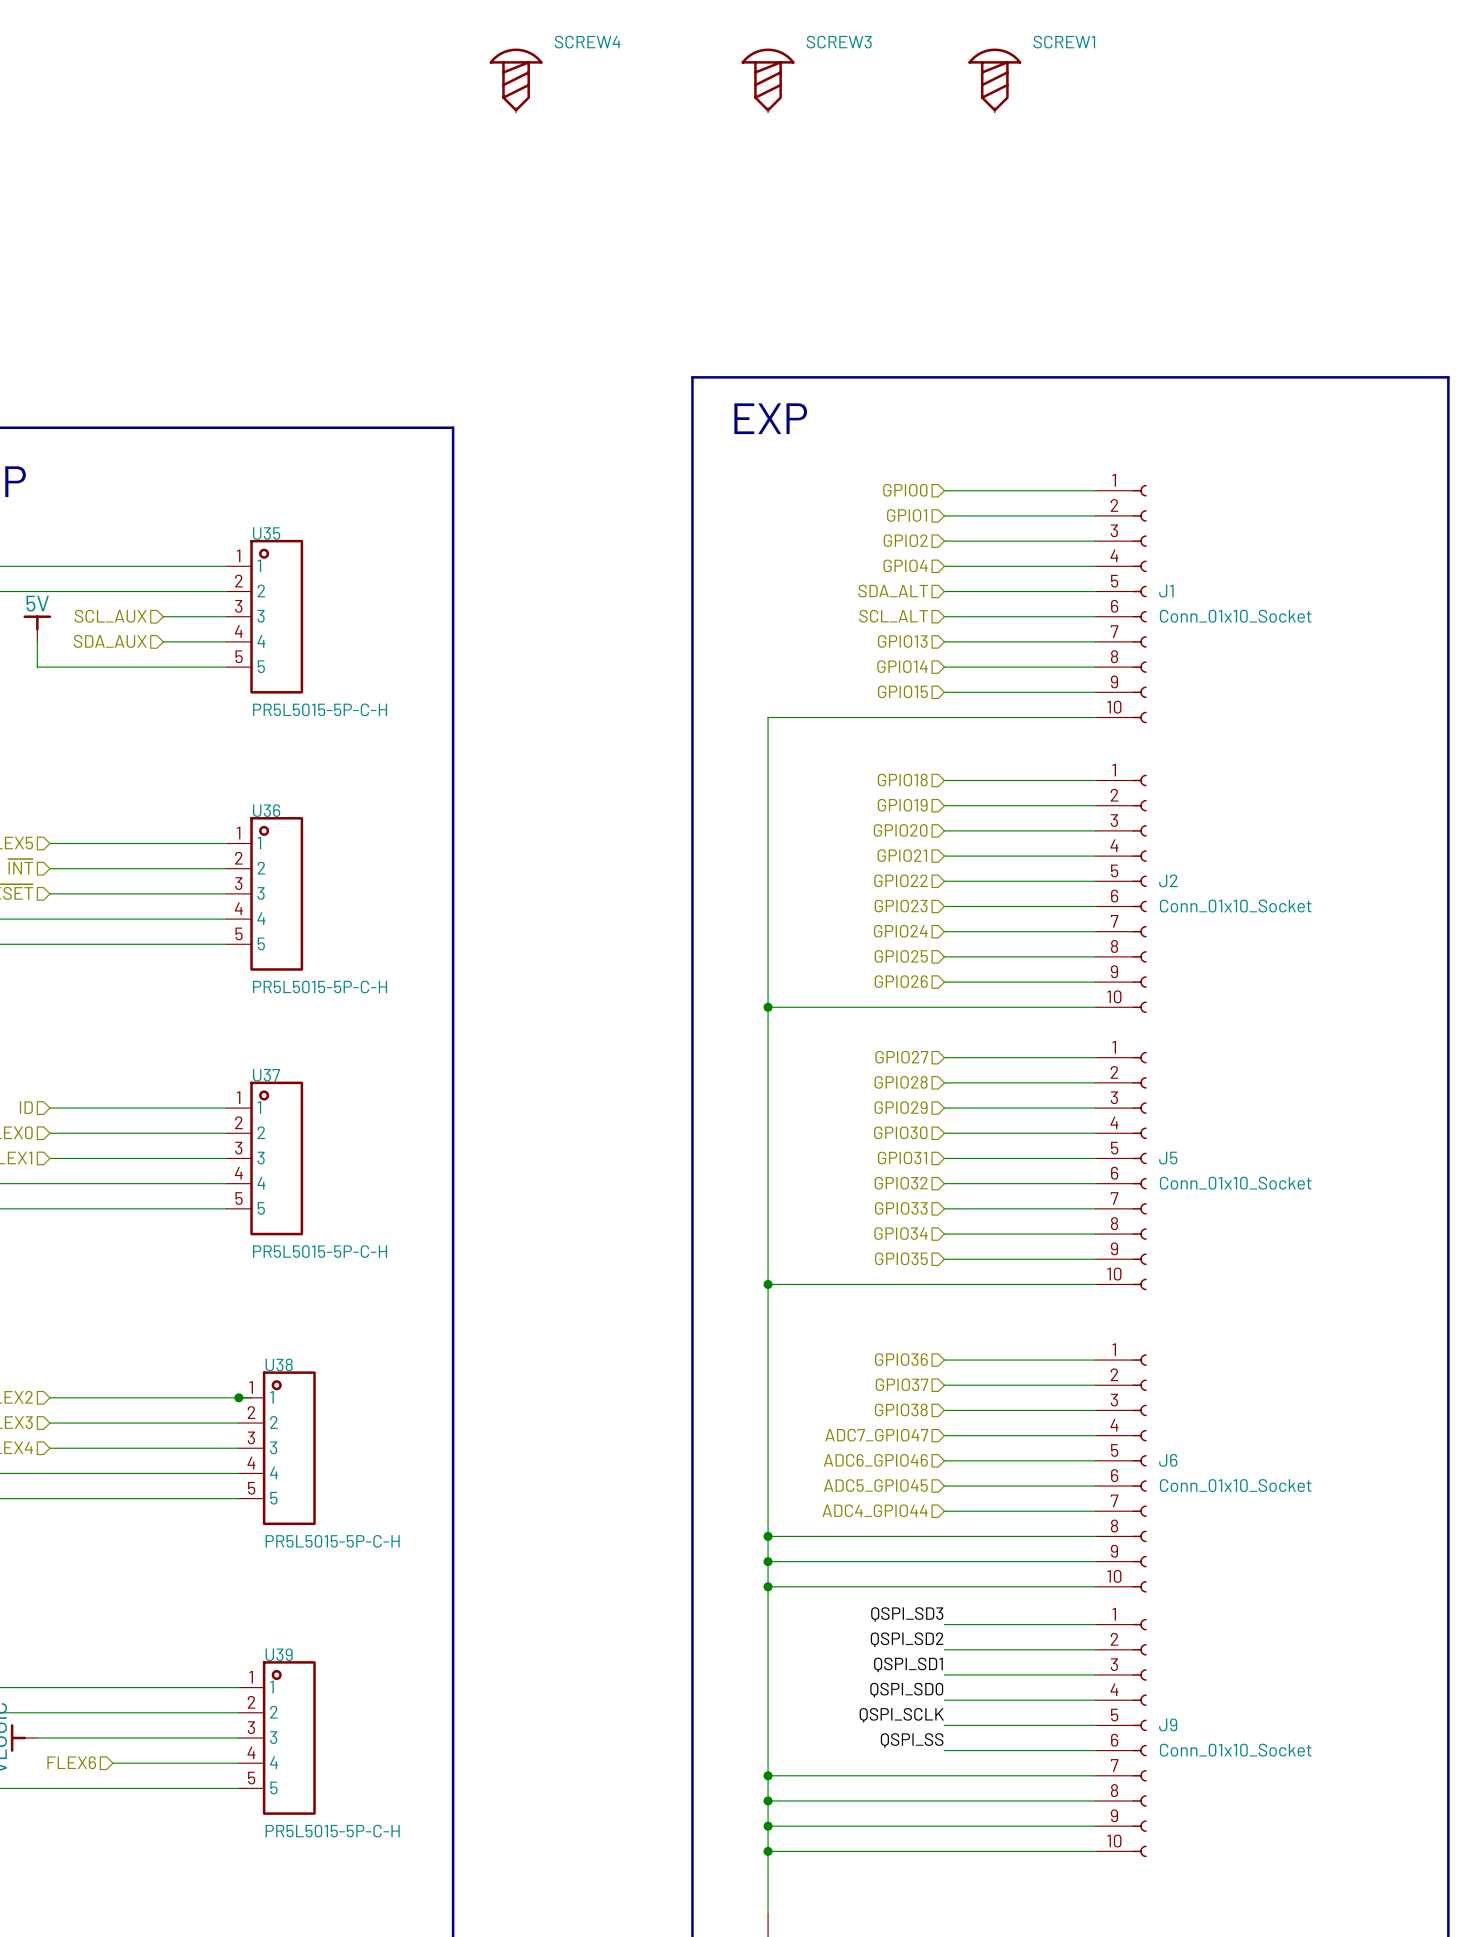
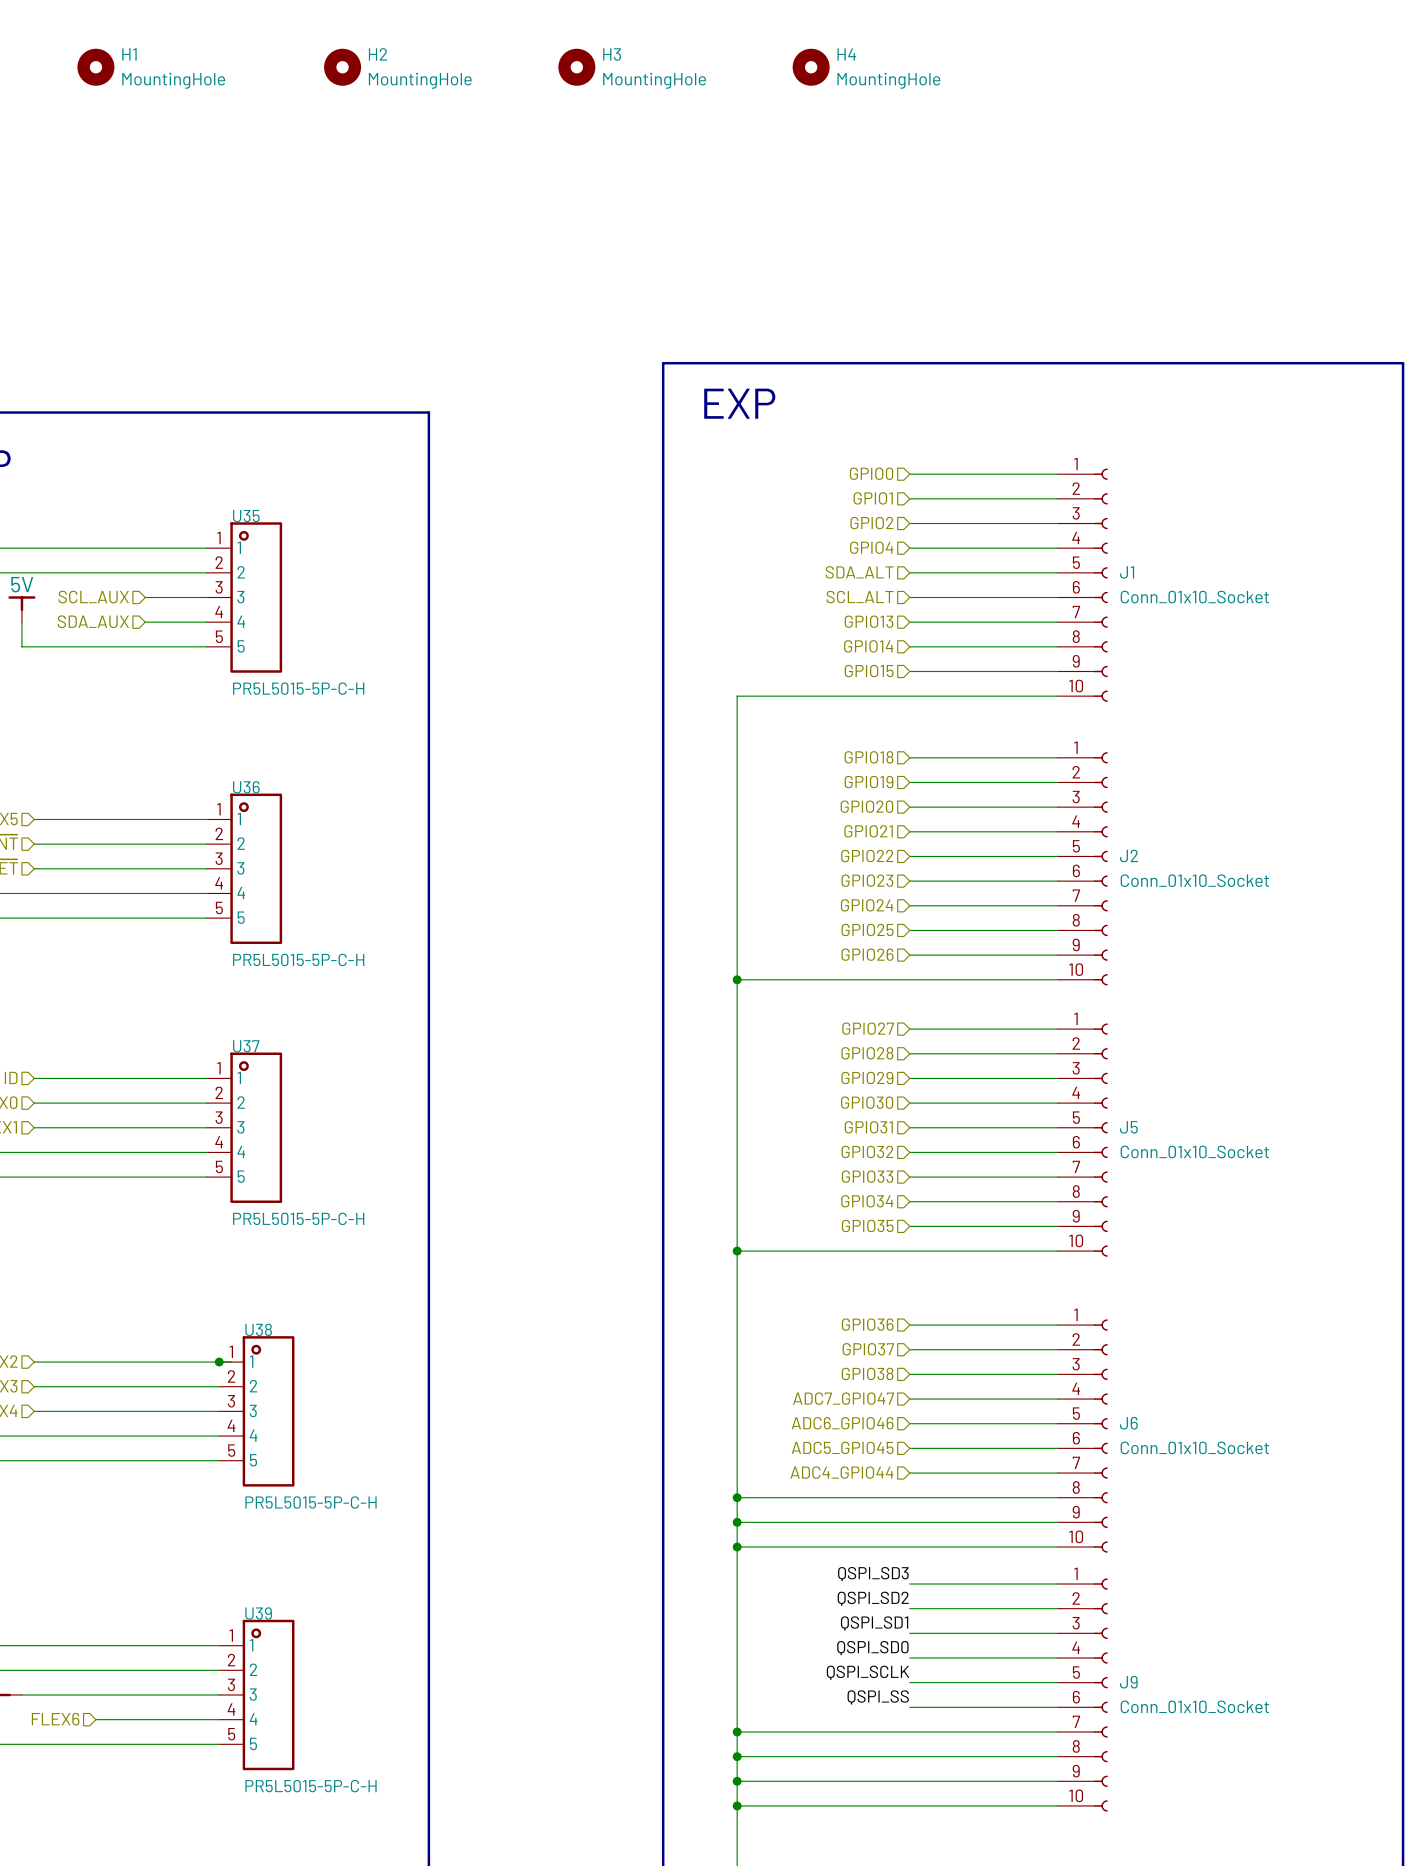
H1: none -> MountingHole (95, 67)
H2: none -> MountingHole (342, 67)
H3: none -> MountingHole (576, 67)
H4: none -> MountingHole (811, 67)
SCREW4: (516, 80) -> none
SCREW3: (768, 80) -> none
SCREW1: (994, 80) -> none

